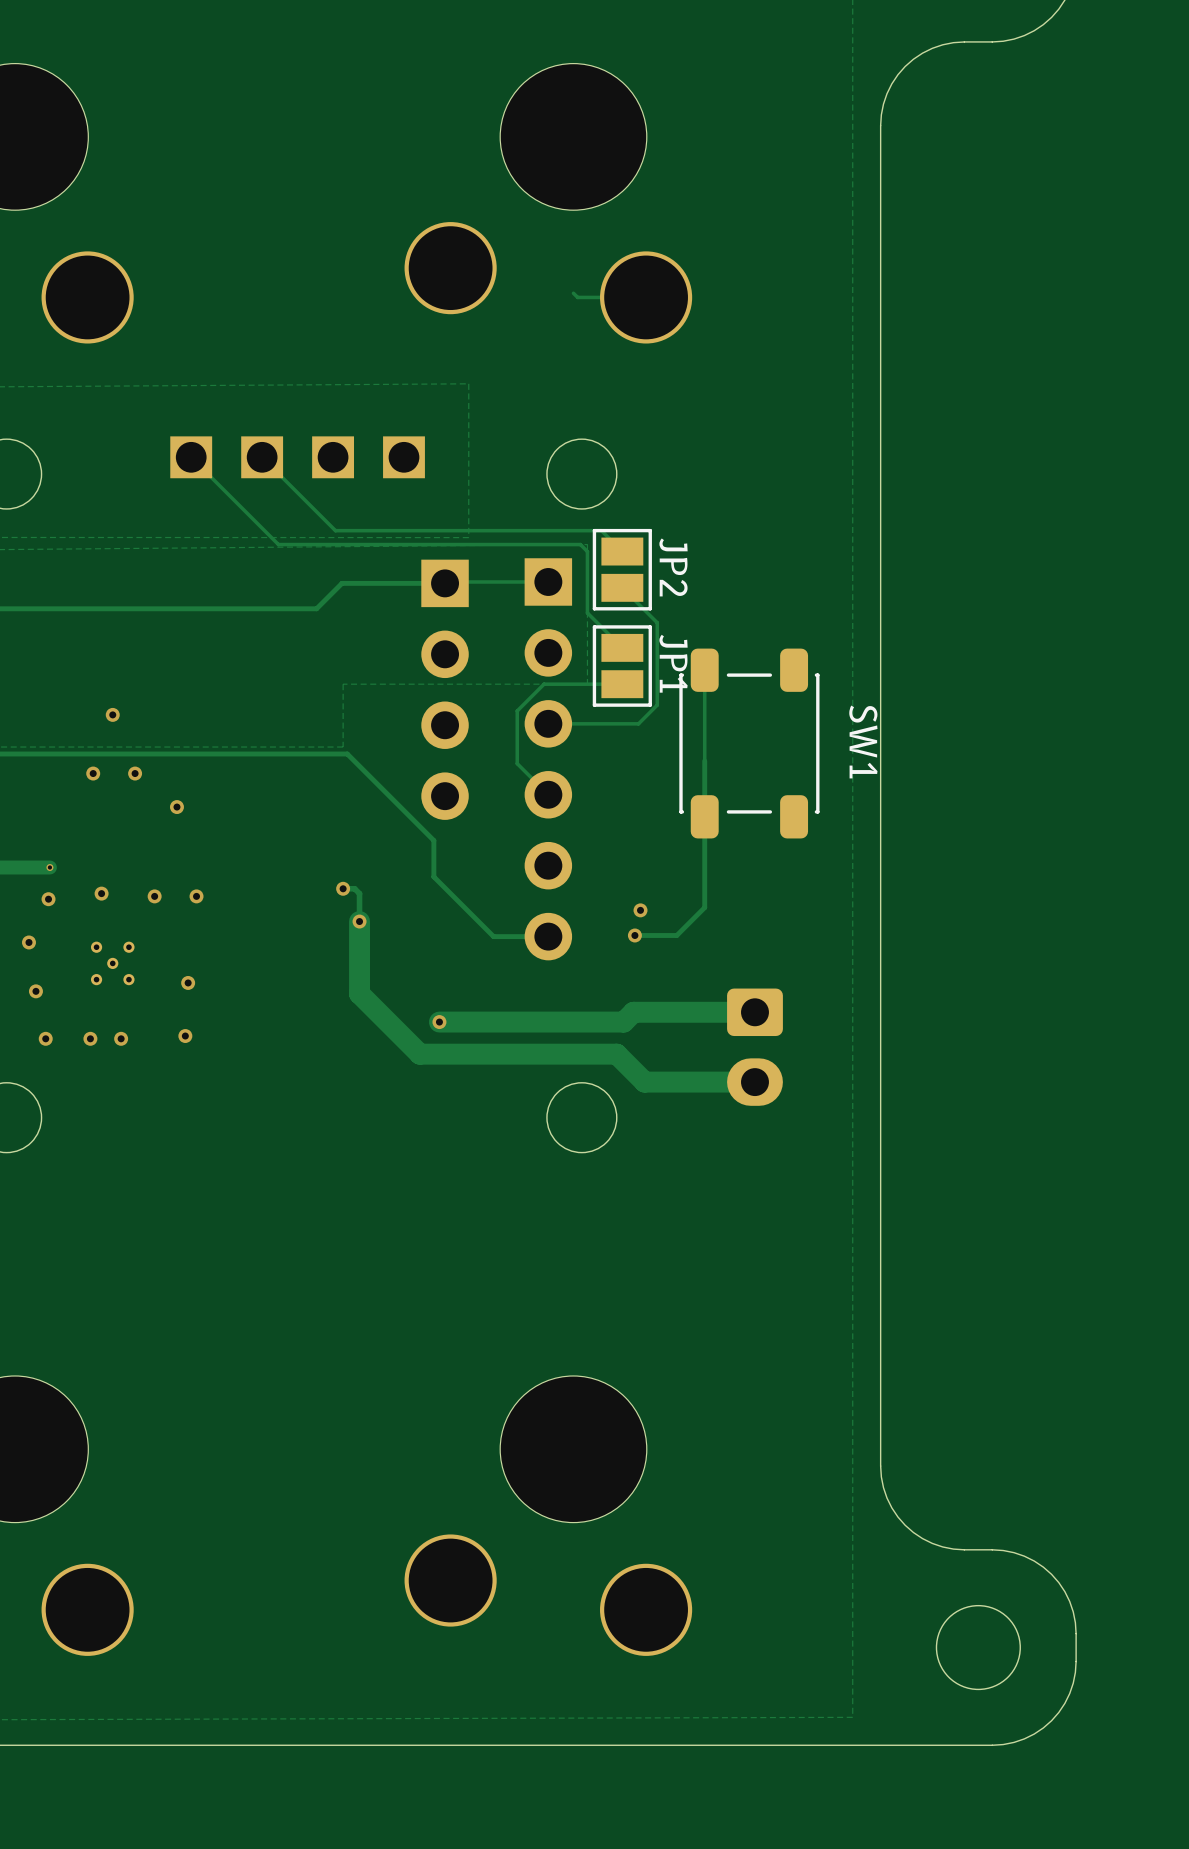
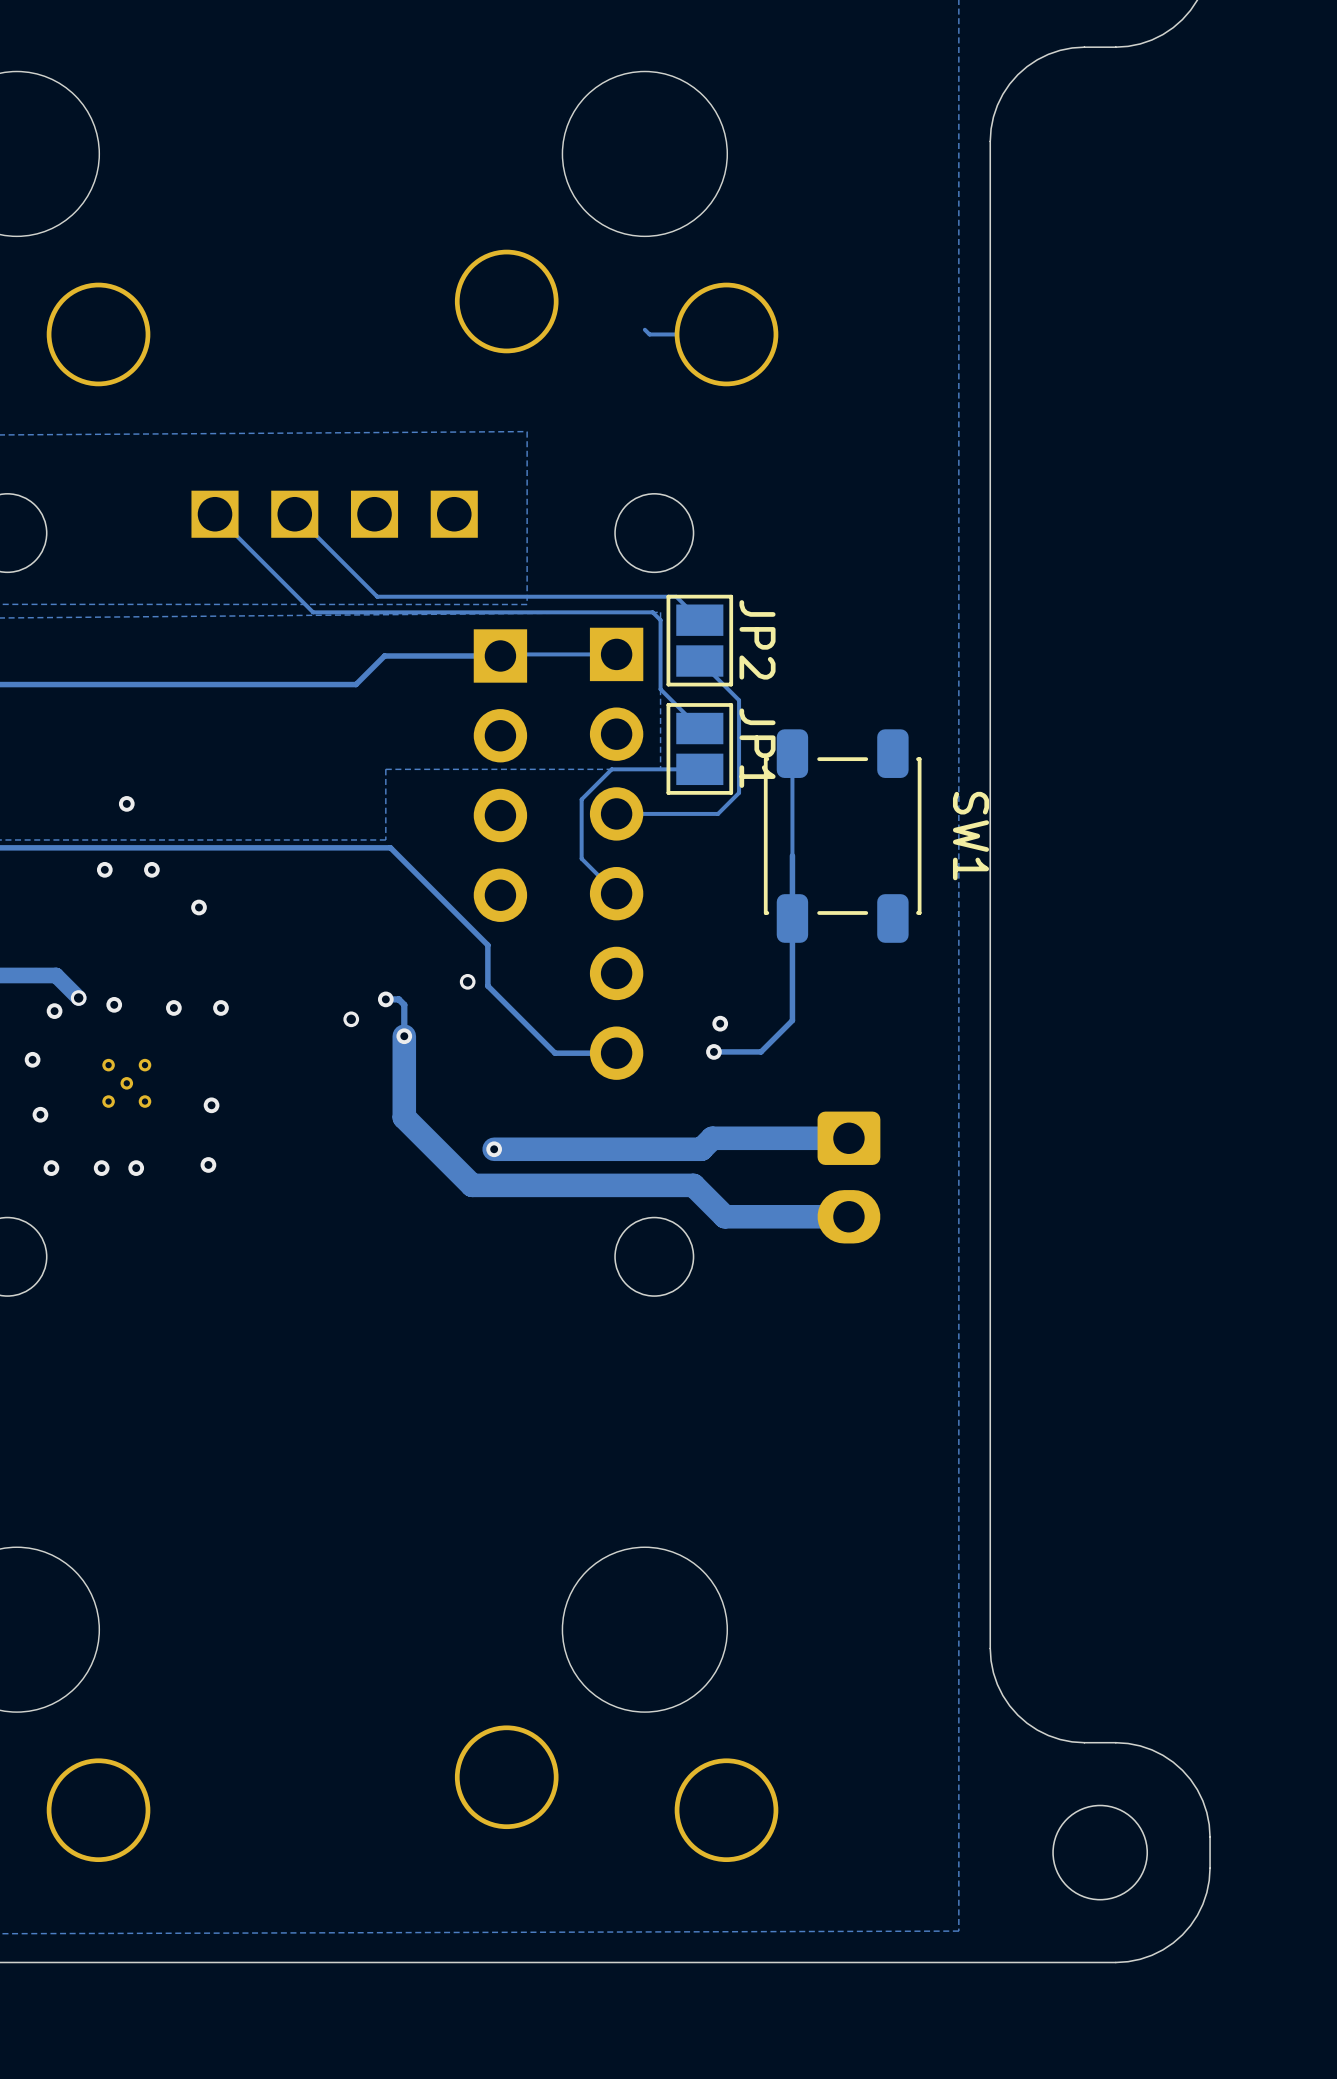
track: none -> (56, 975) (78, 998)
via: (49, 867) -> none
via: none -> (467, 981)
via: none -> (78, 998)
via: none -> (351, 1019)

